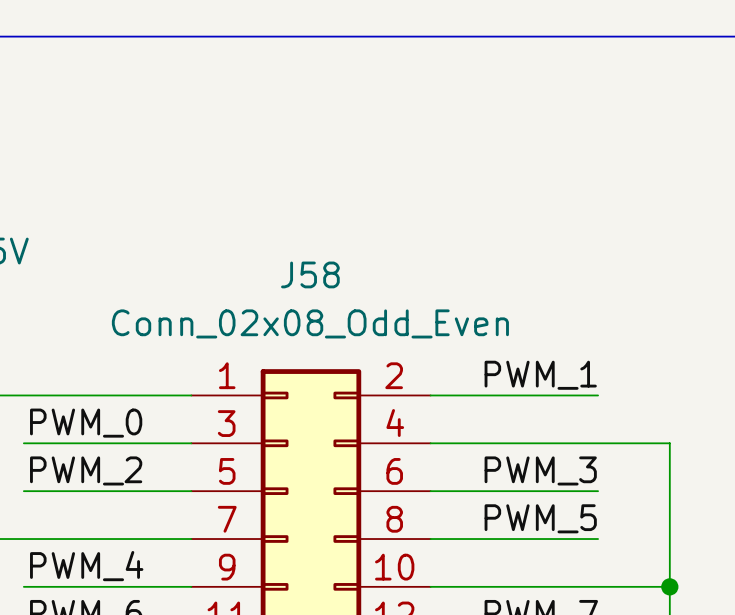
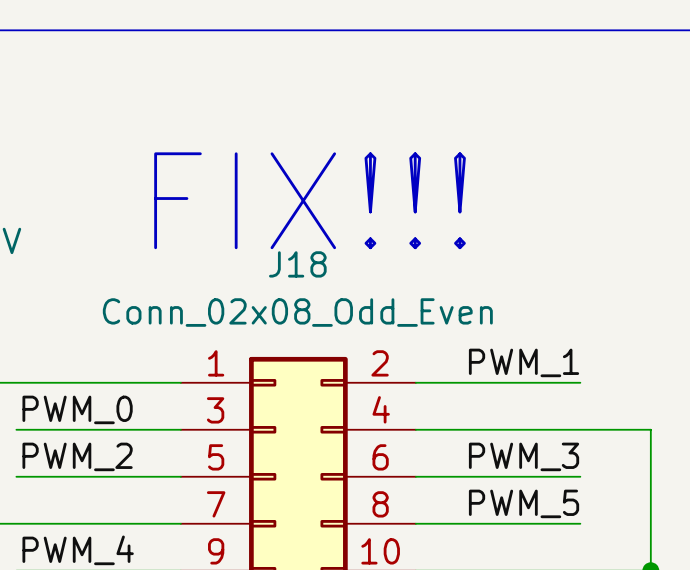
text: none -> FIX!!! (310, 200)
J58 name: J58 (310, 274) -> J18 (297, 264)

